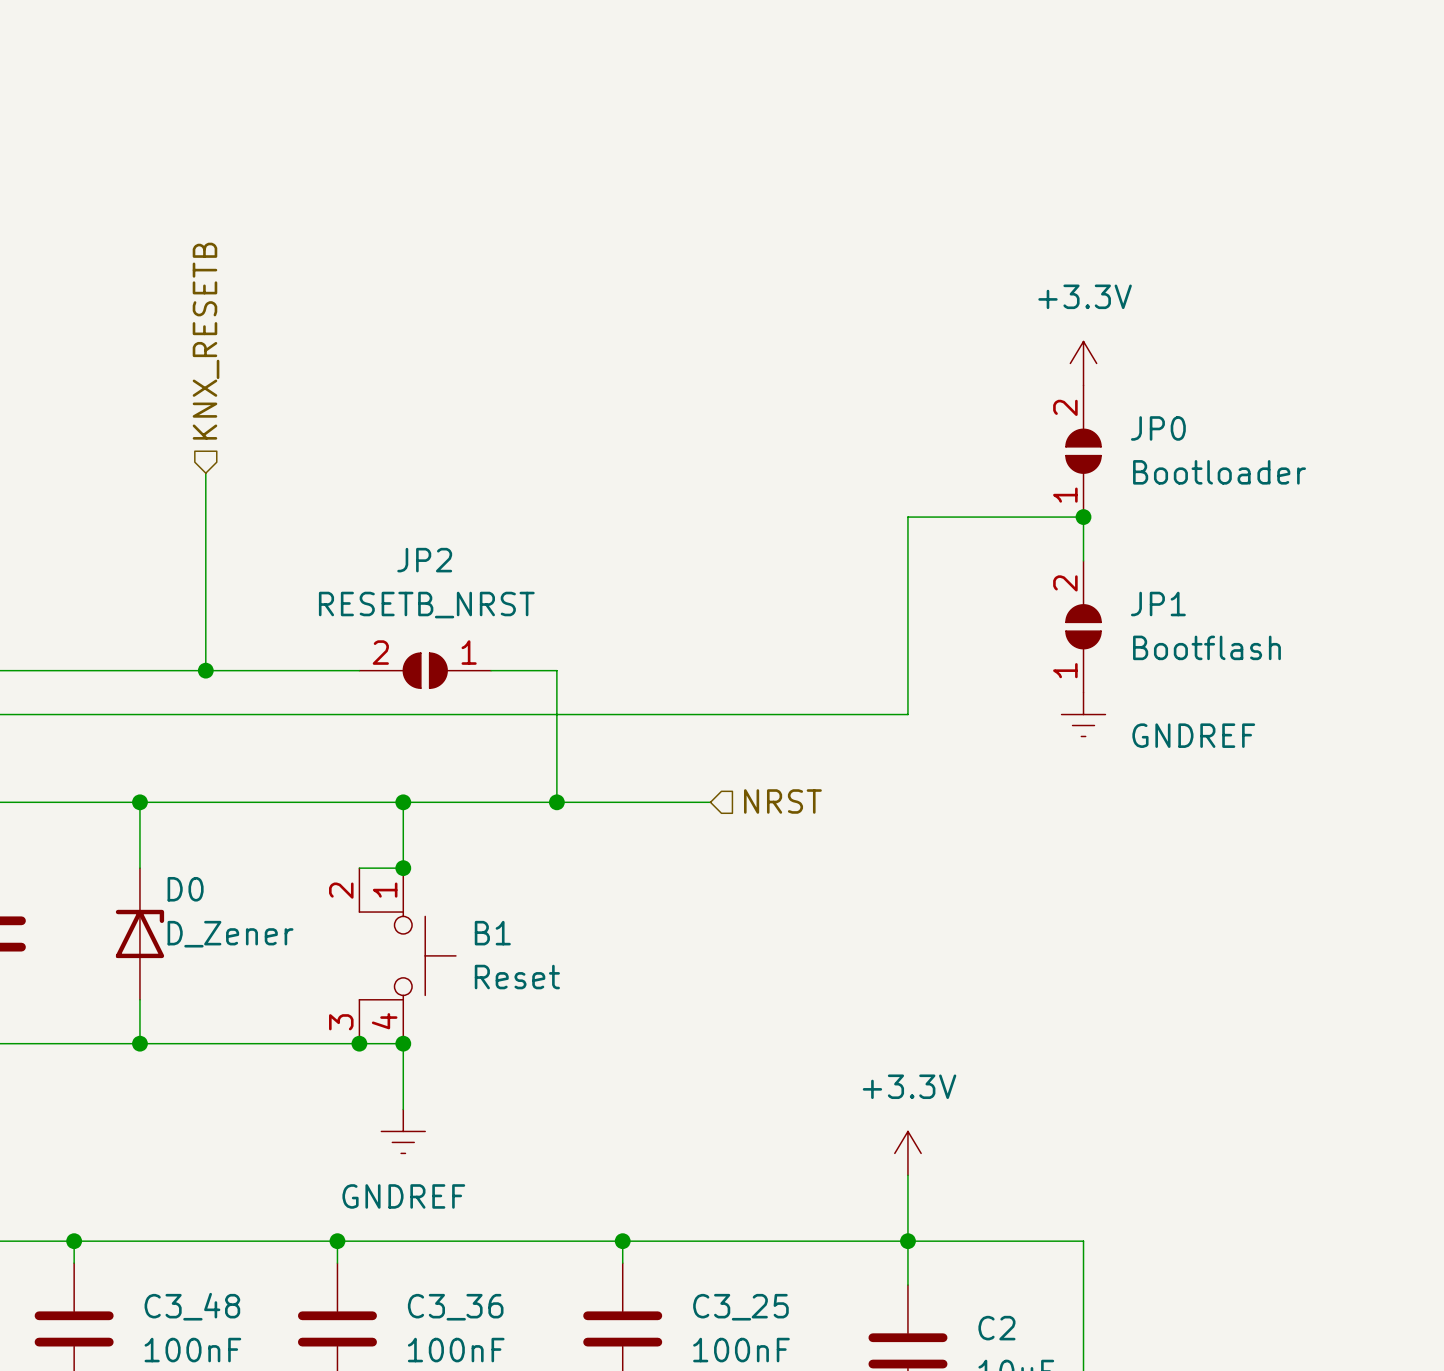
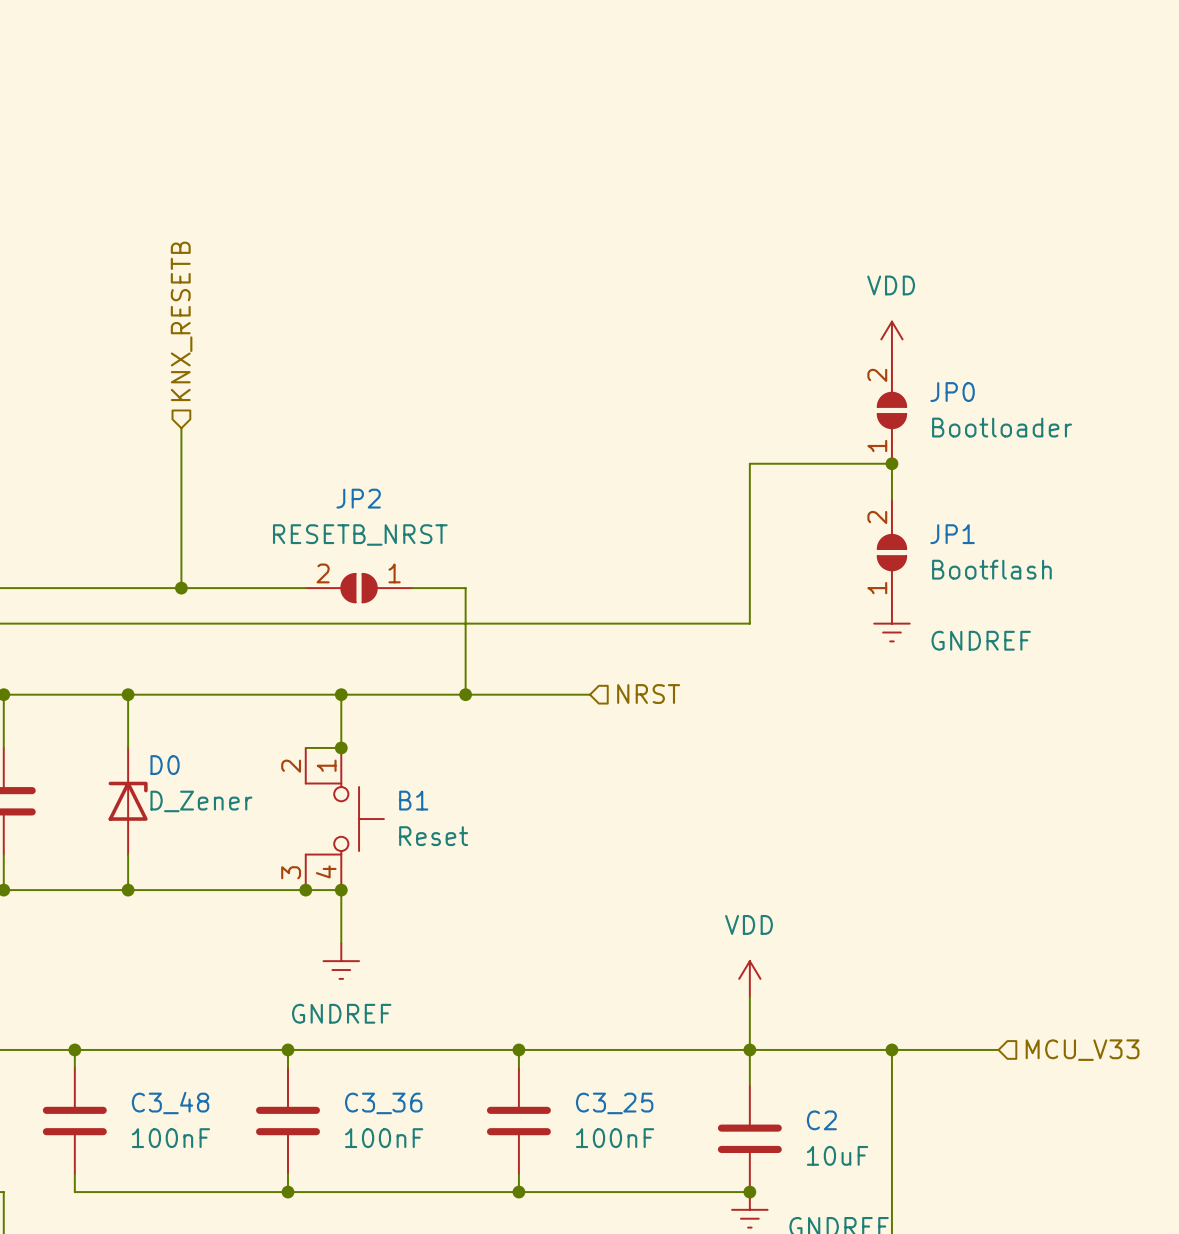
power symbol: +3.3V (1083, 363) -> VDD (891, 339)
power symbol: +3.3V (907, 1153) -> VDD (749, 978)
wire: none -> (891, 1049) (998, 1049)
junction: none -> (891, 1049)
hierarchical label: none -> MCU_V33 (1082, 1050)

